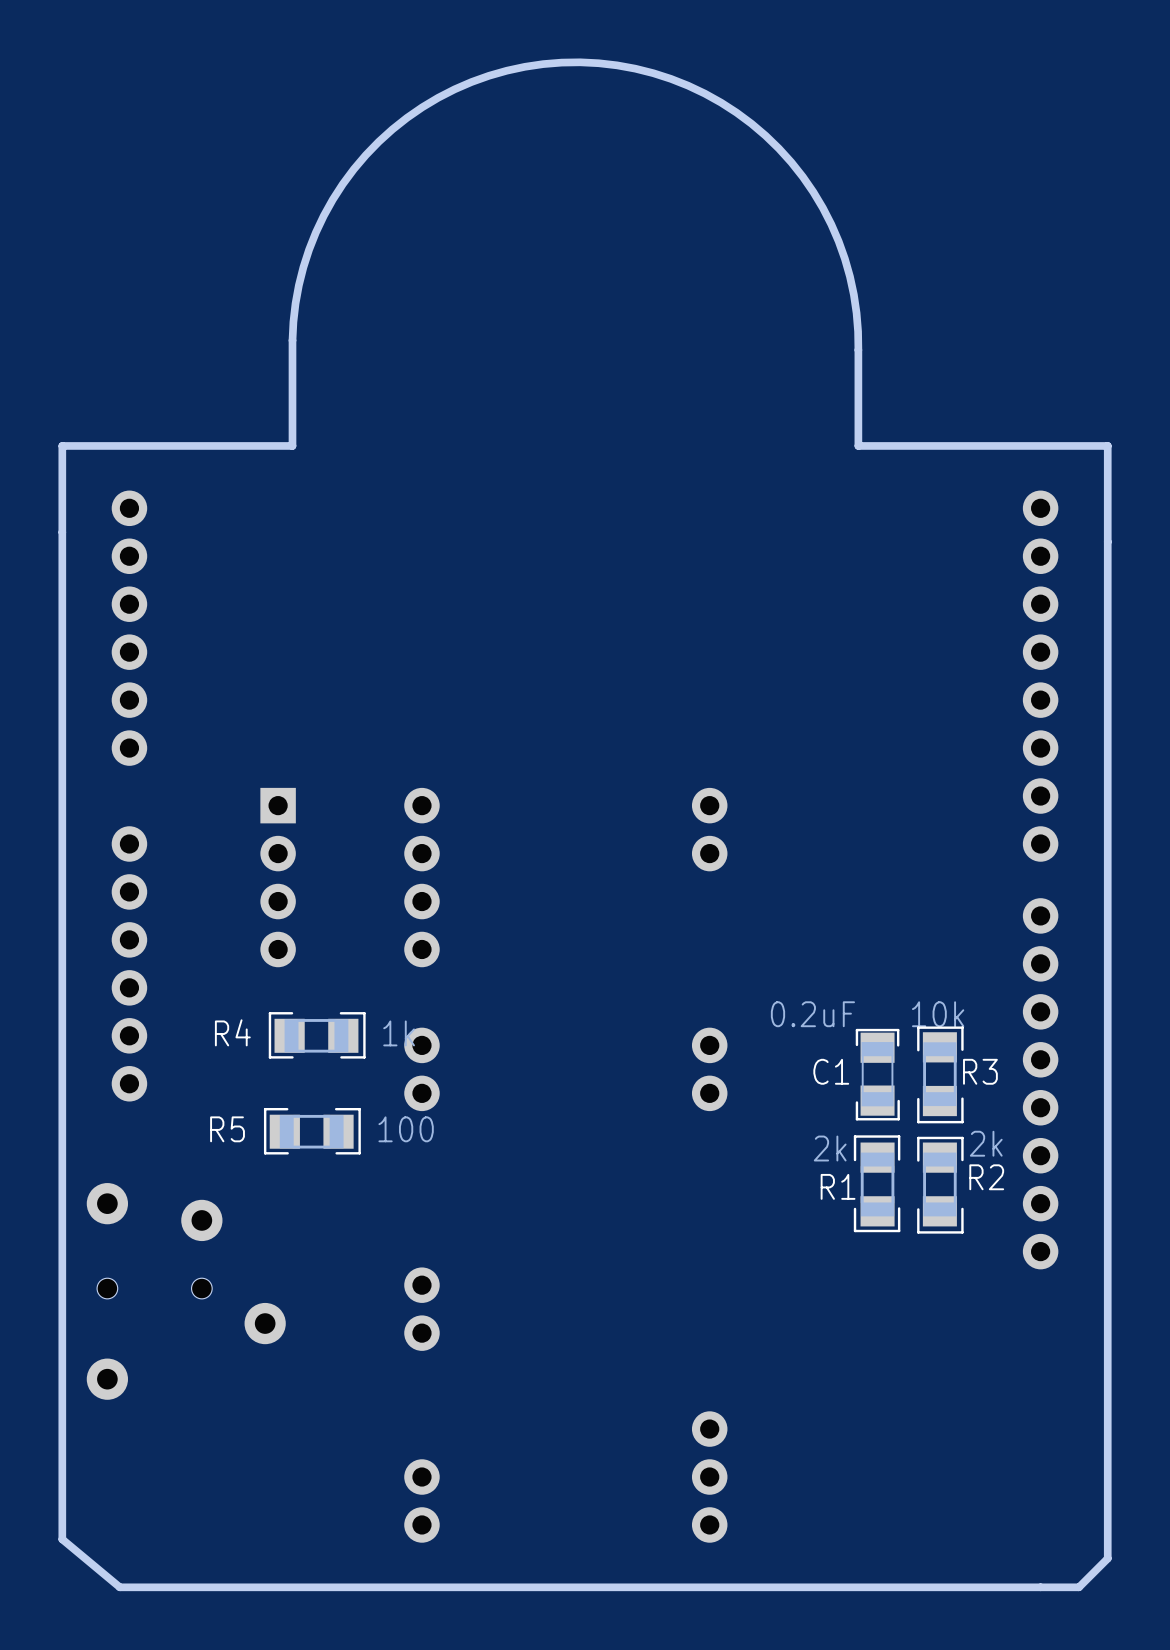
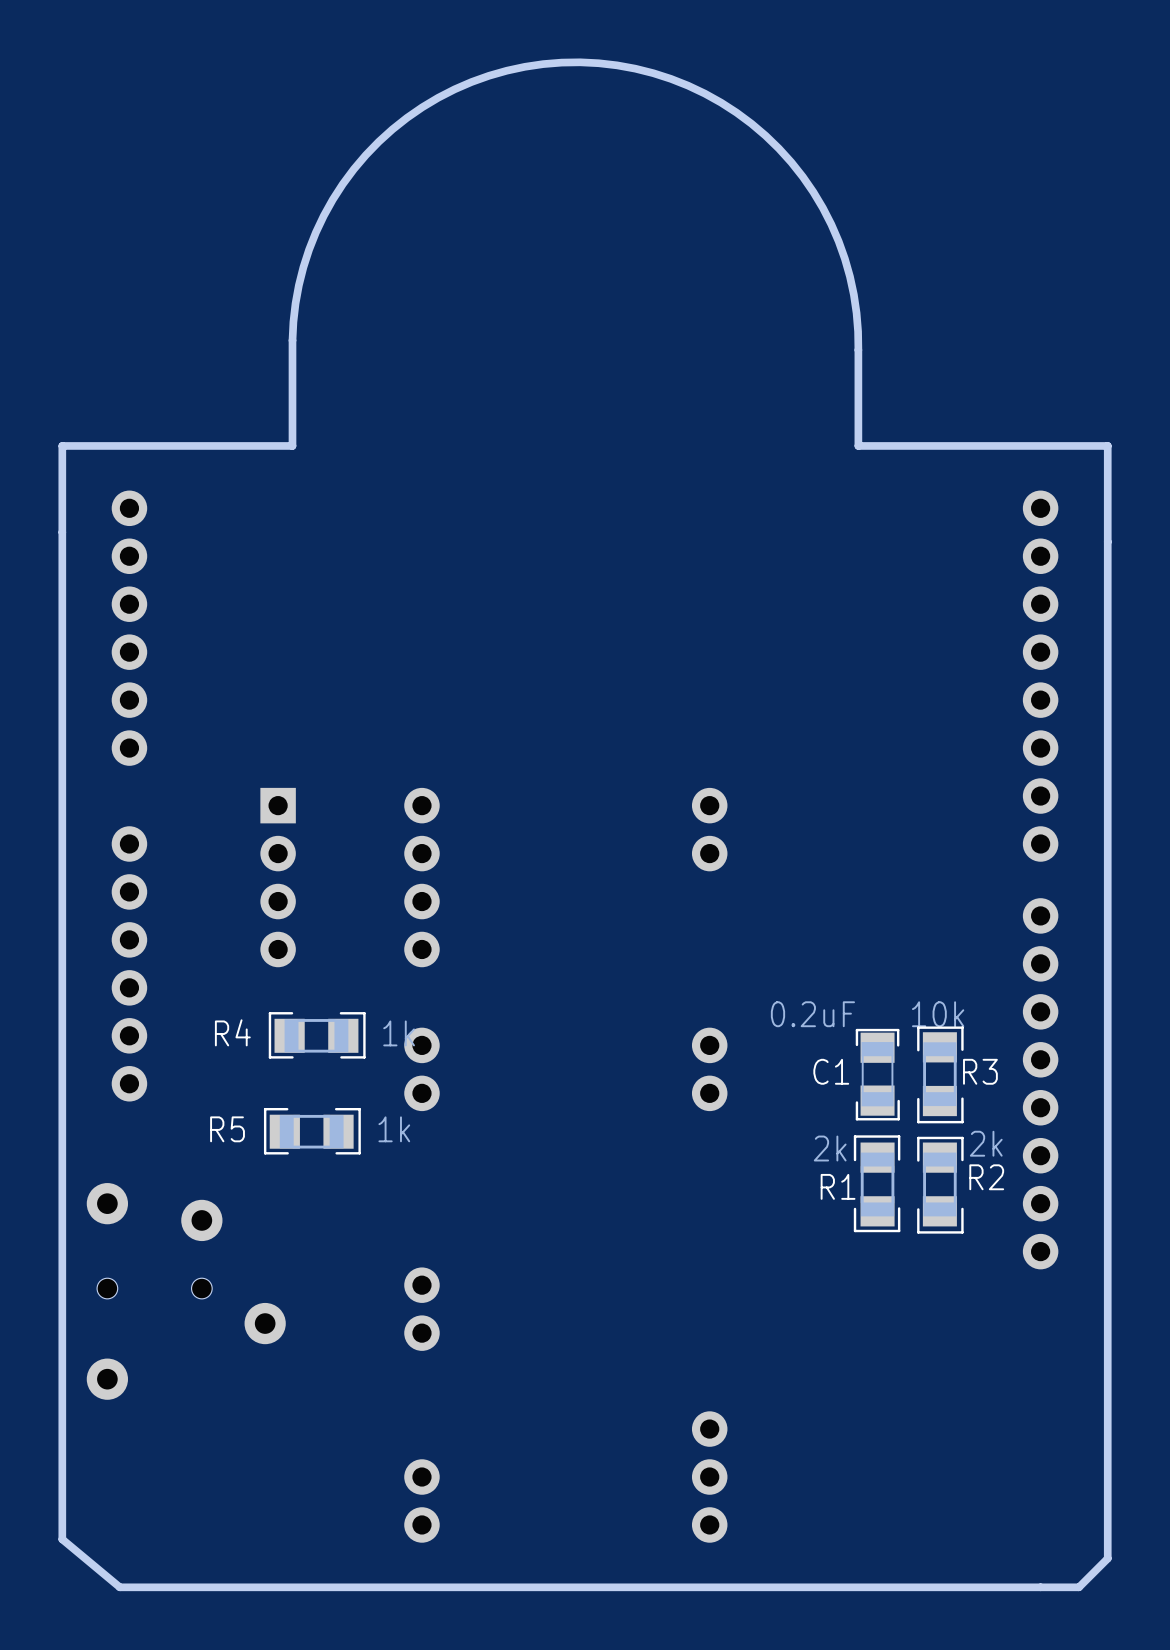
R5 value: 100 (406, 1129) -> 1k (394, 1129)

